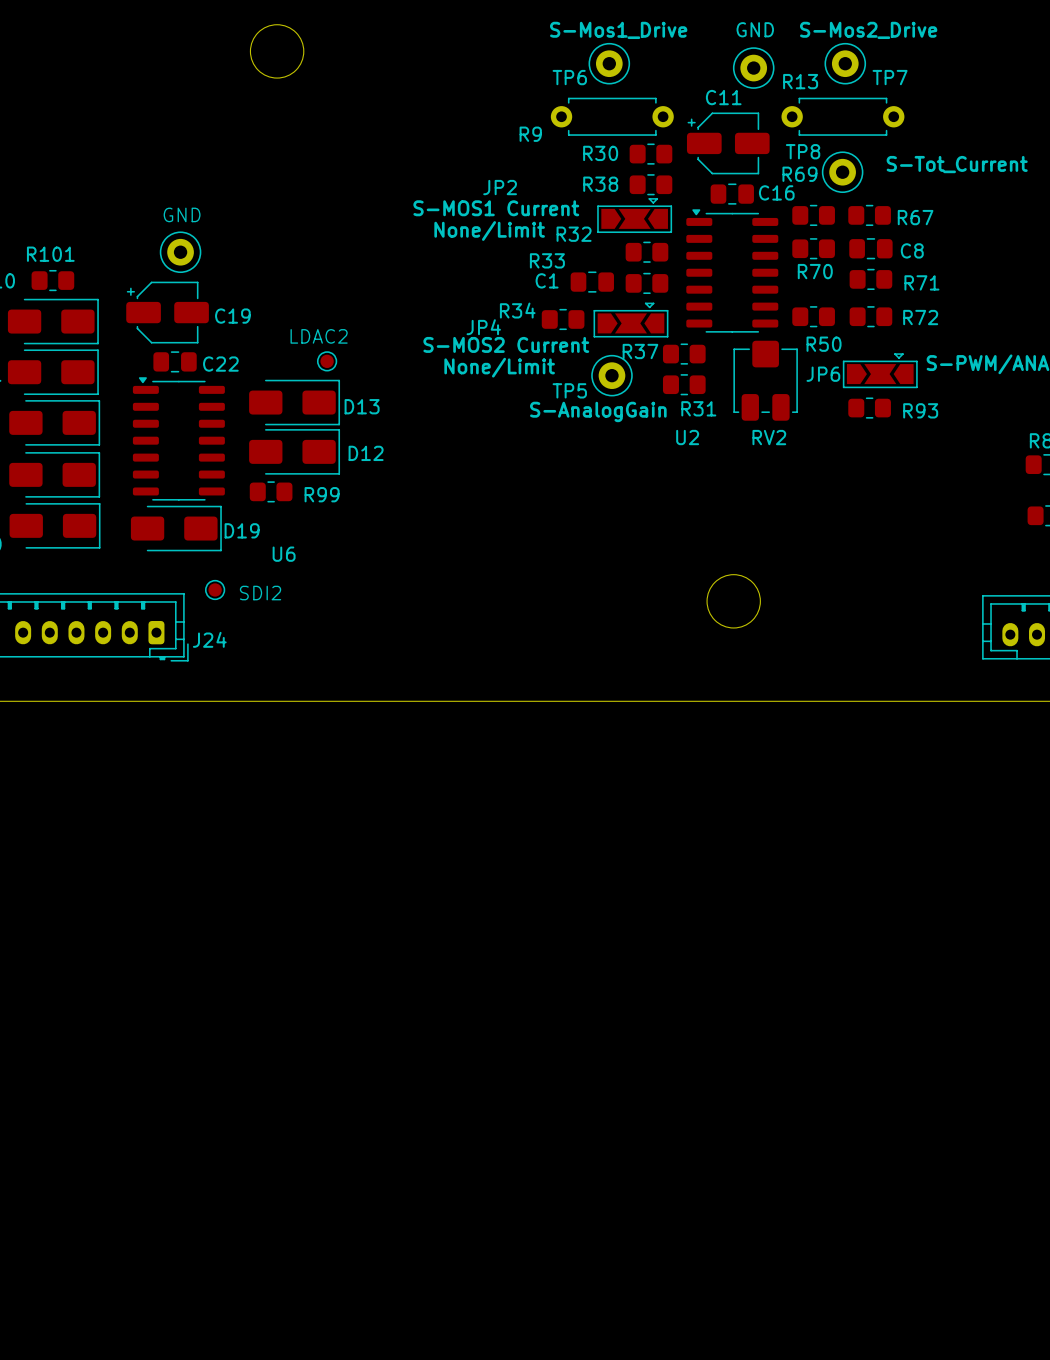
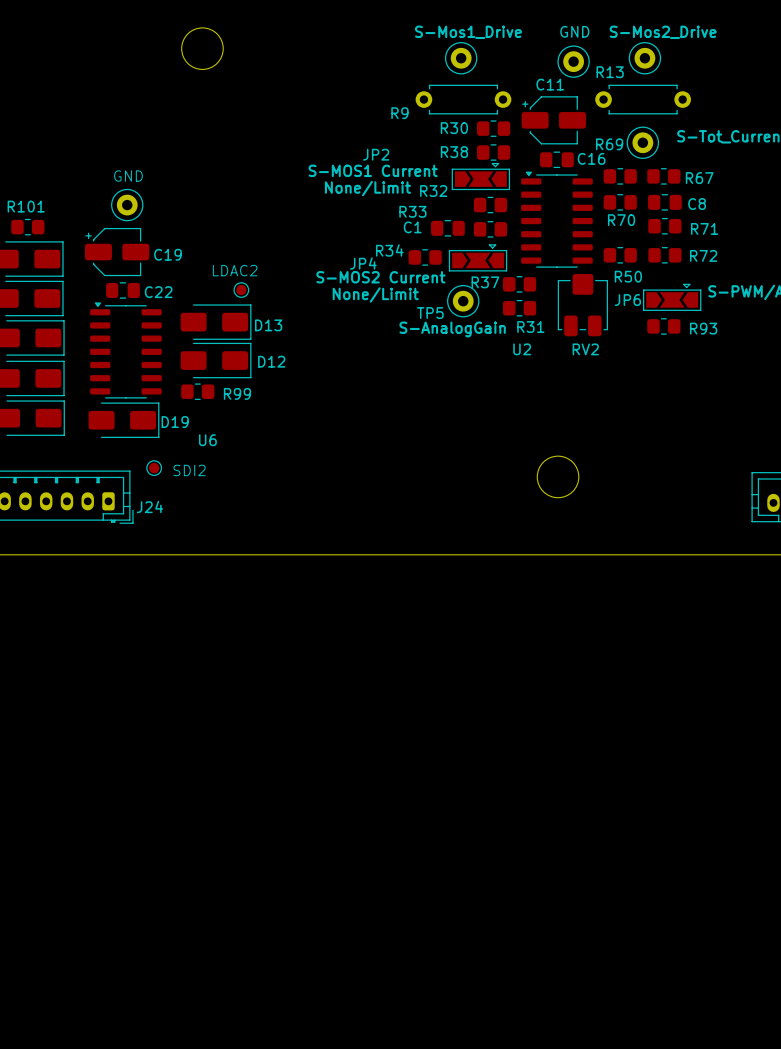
TP6 name: TP6 (569, 77) -> none
TP7 name: TP7 (890, 77) -> none
TP8 name: TP8 (803, 151) -> none

